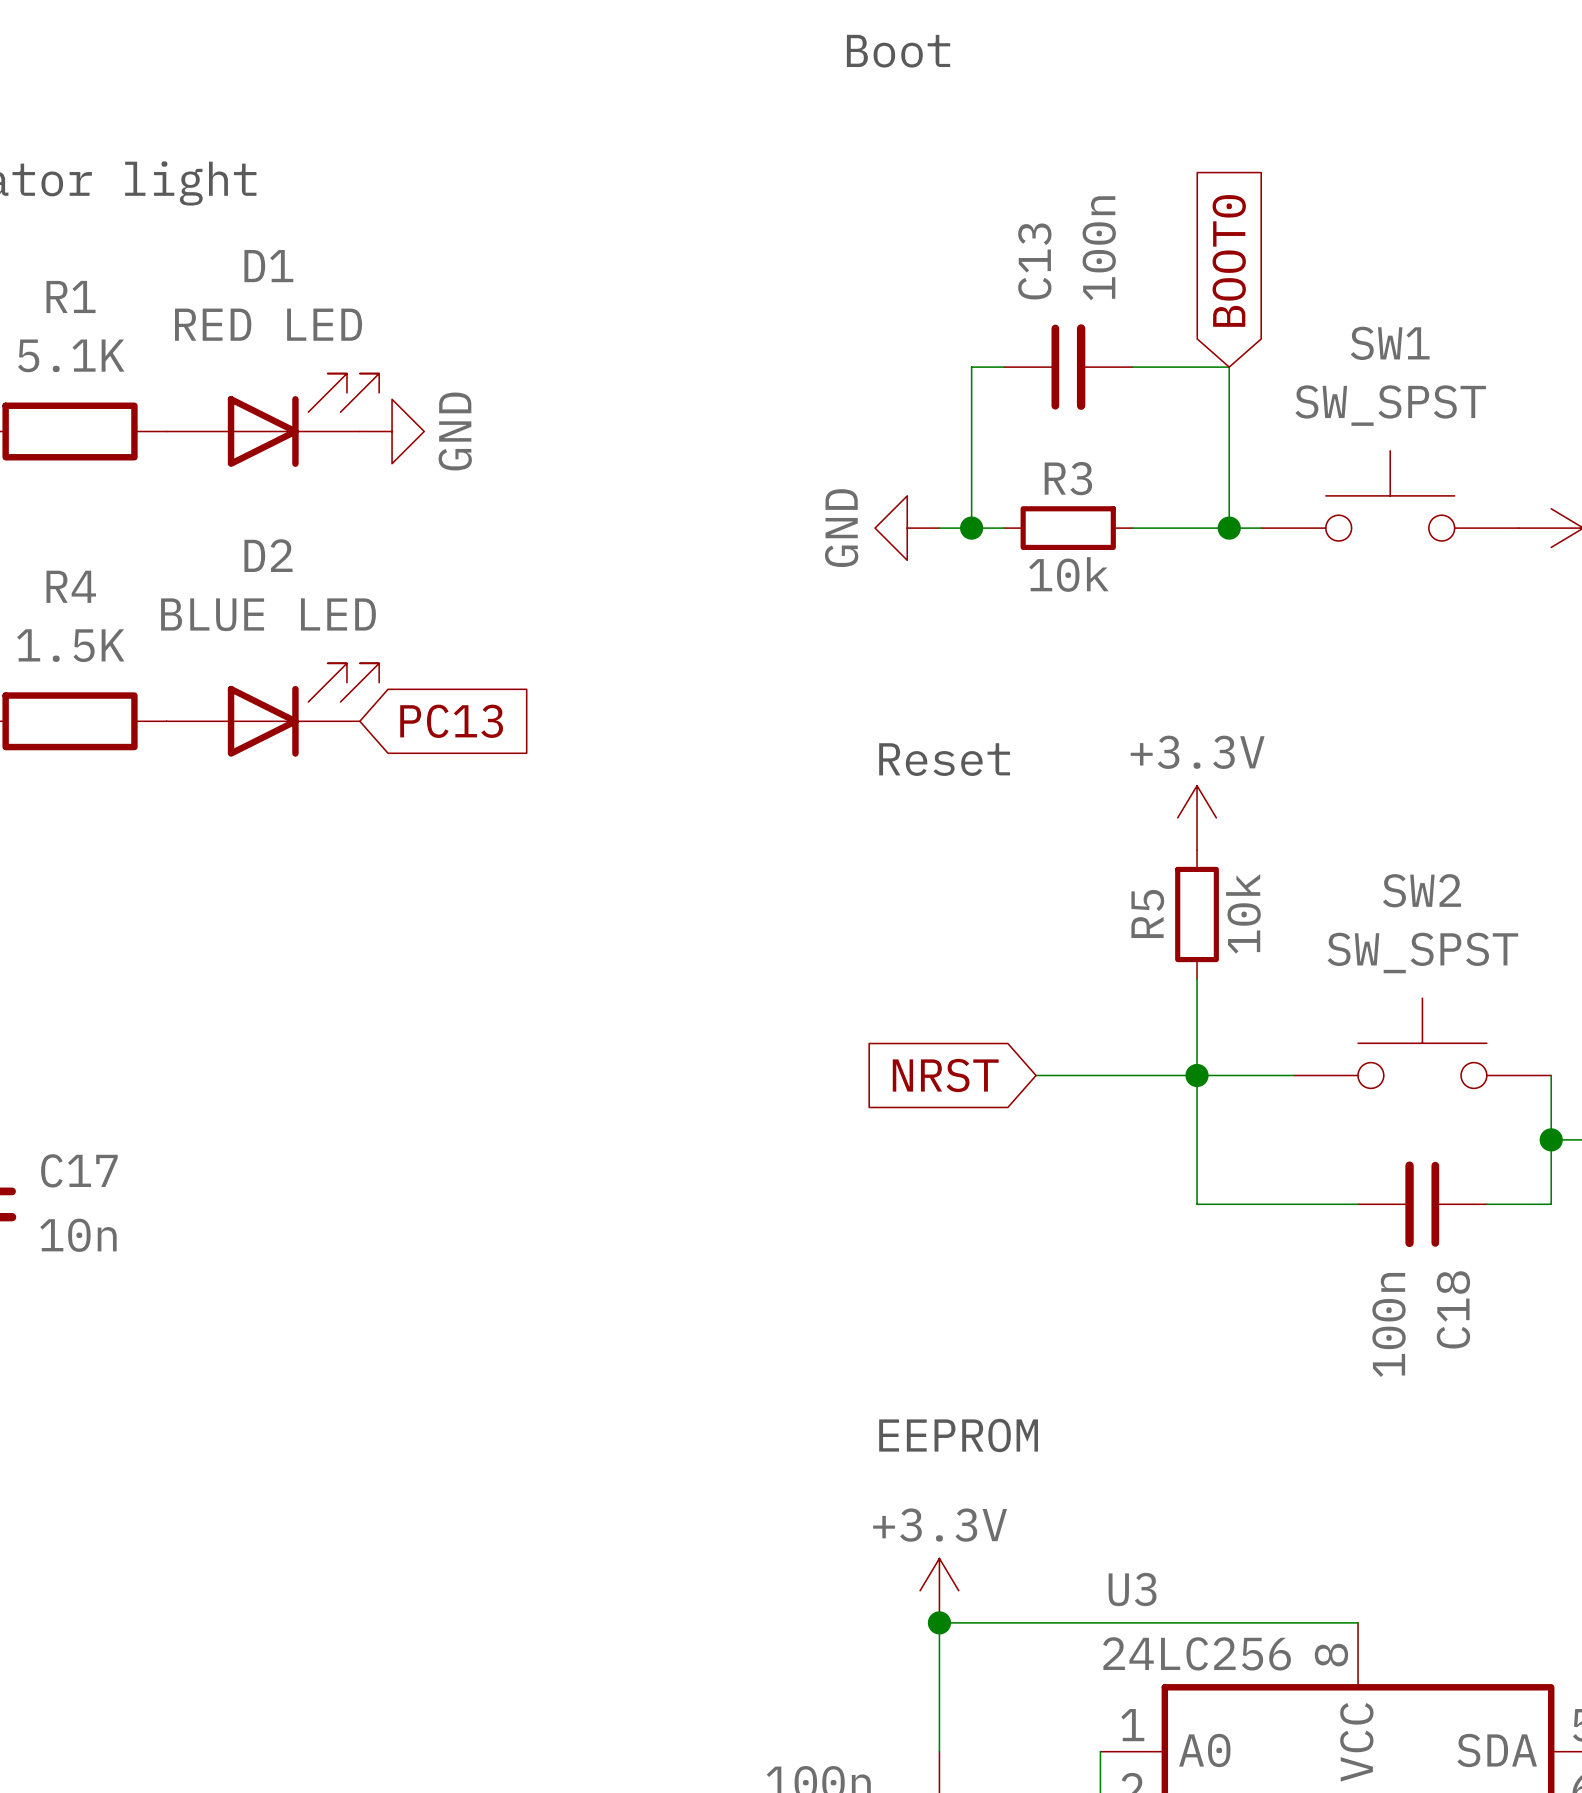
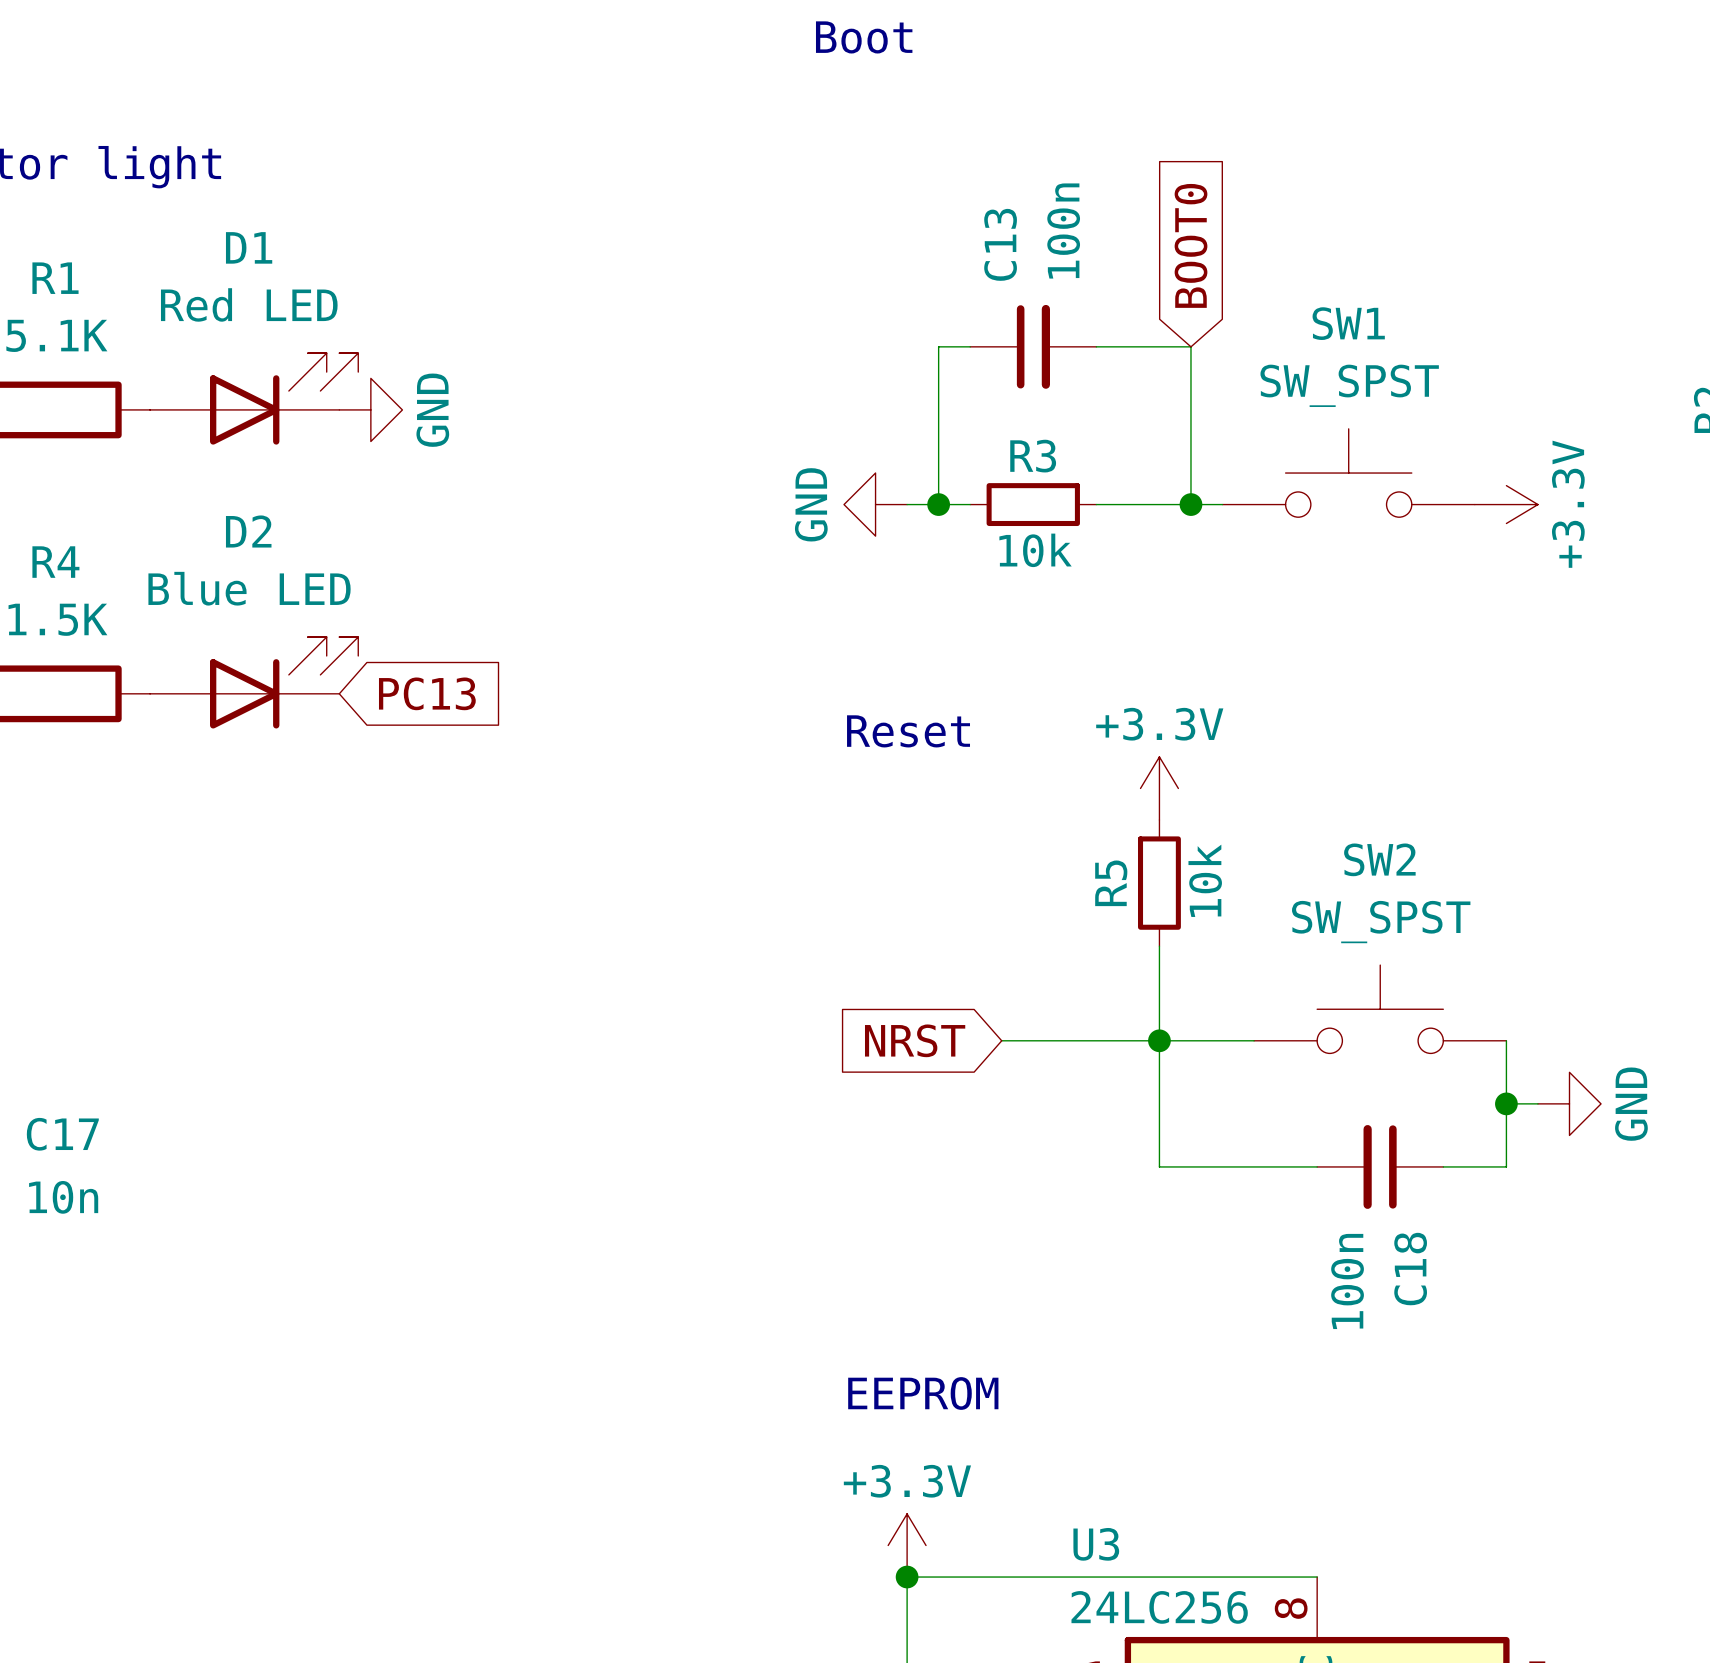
D1 value: RED LED (268, 324) -> Red LED (249, 304)
D2 value: BLUE LED (268, 614) -> Blue LED (249, 588)

